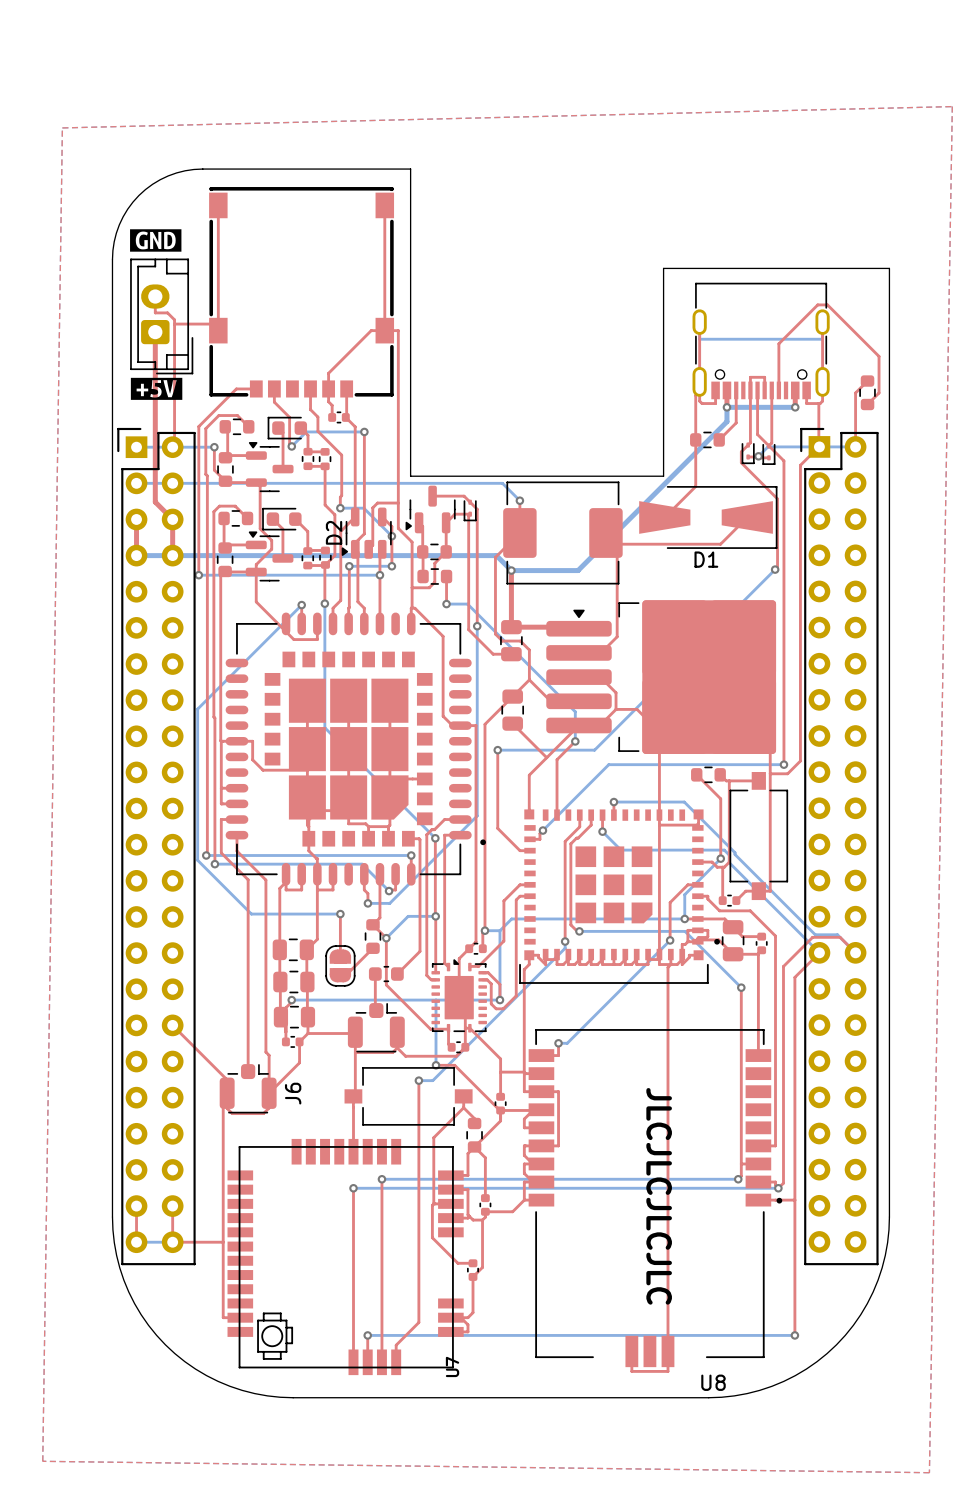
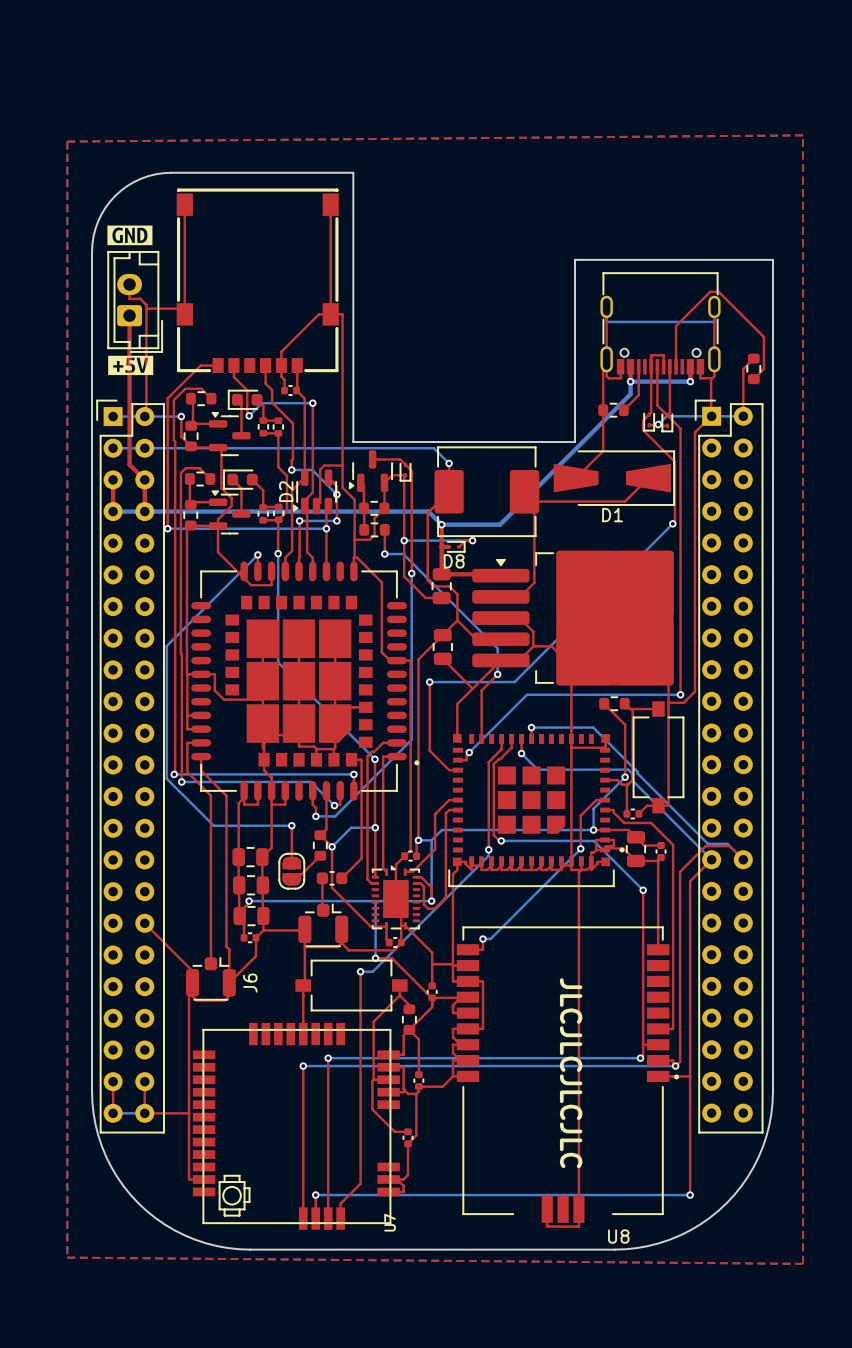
top zone outline: (952, 106) (62, 127) (42, 1461) (929, 1472) (952, 106) -> (803, 135) (67, 141) (67, 1257) (803, 1263) (803, 135)
bottom track: none -> (404, 540) (472, 540)
via: none -> (404, 540)
top track: none -> (472, 540) (465, 540) (459, 546)
via: none -> (472, 540)
top track: none -> (441, 546) (448, 546)
D8: none -> (455, 546)

